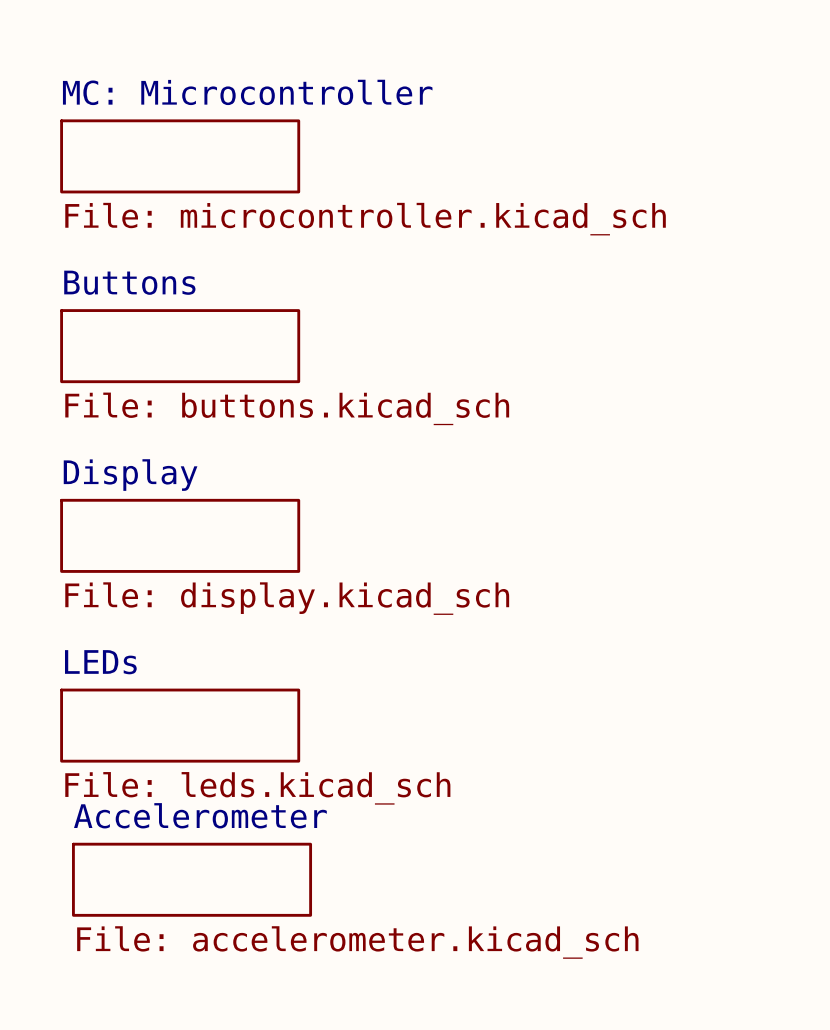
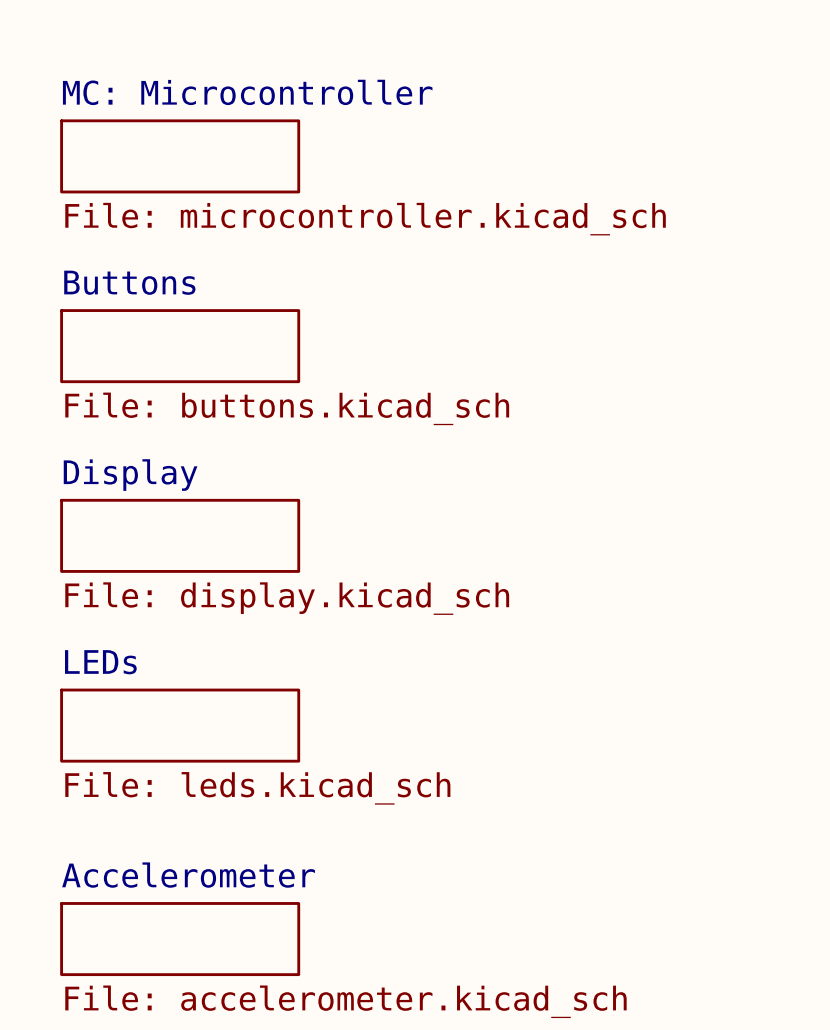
sheet Accelerometer position: (192, 879) -> (180, 939)

